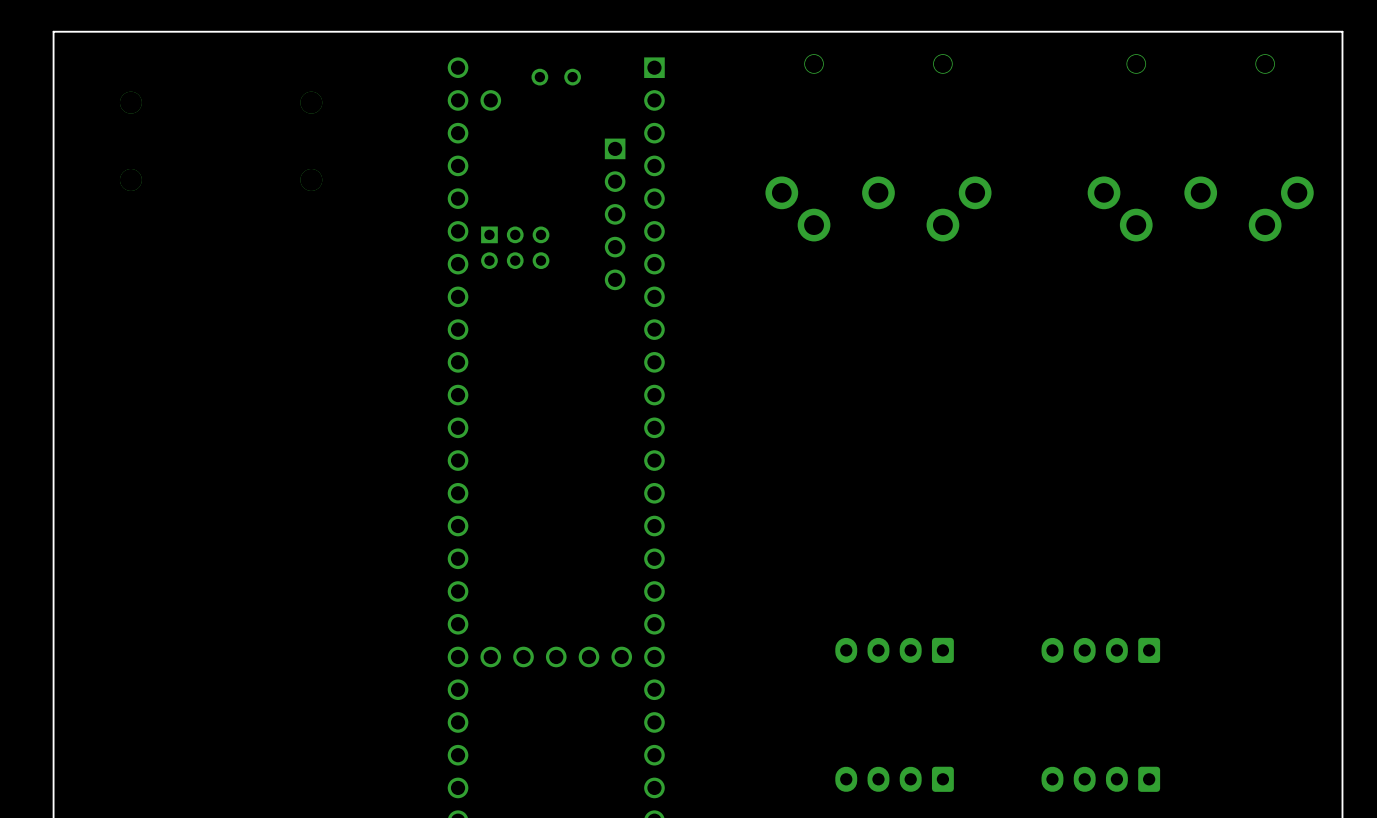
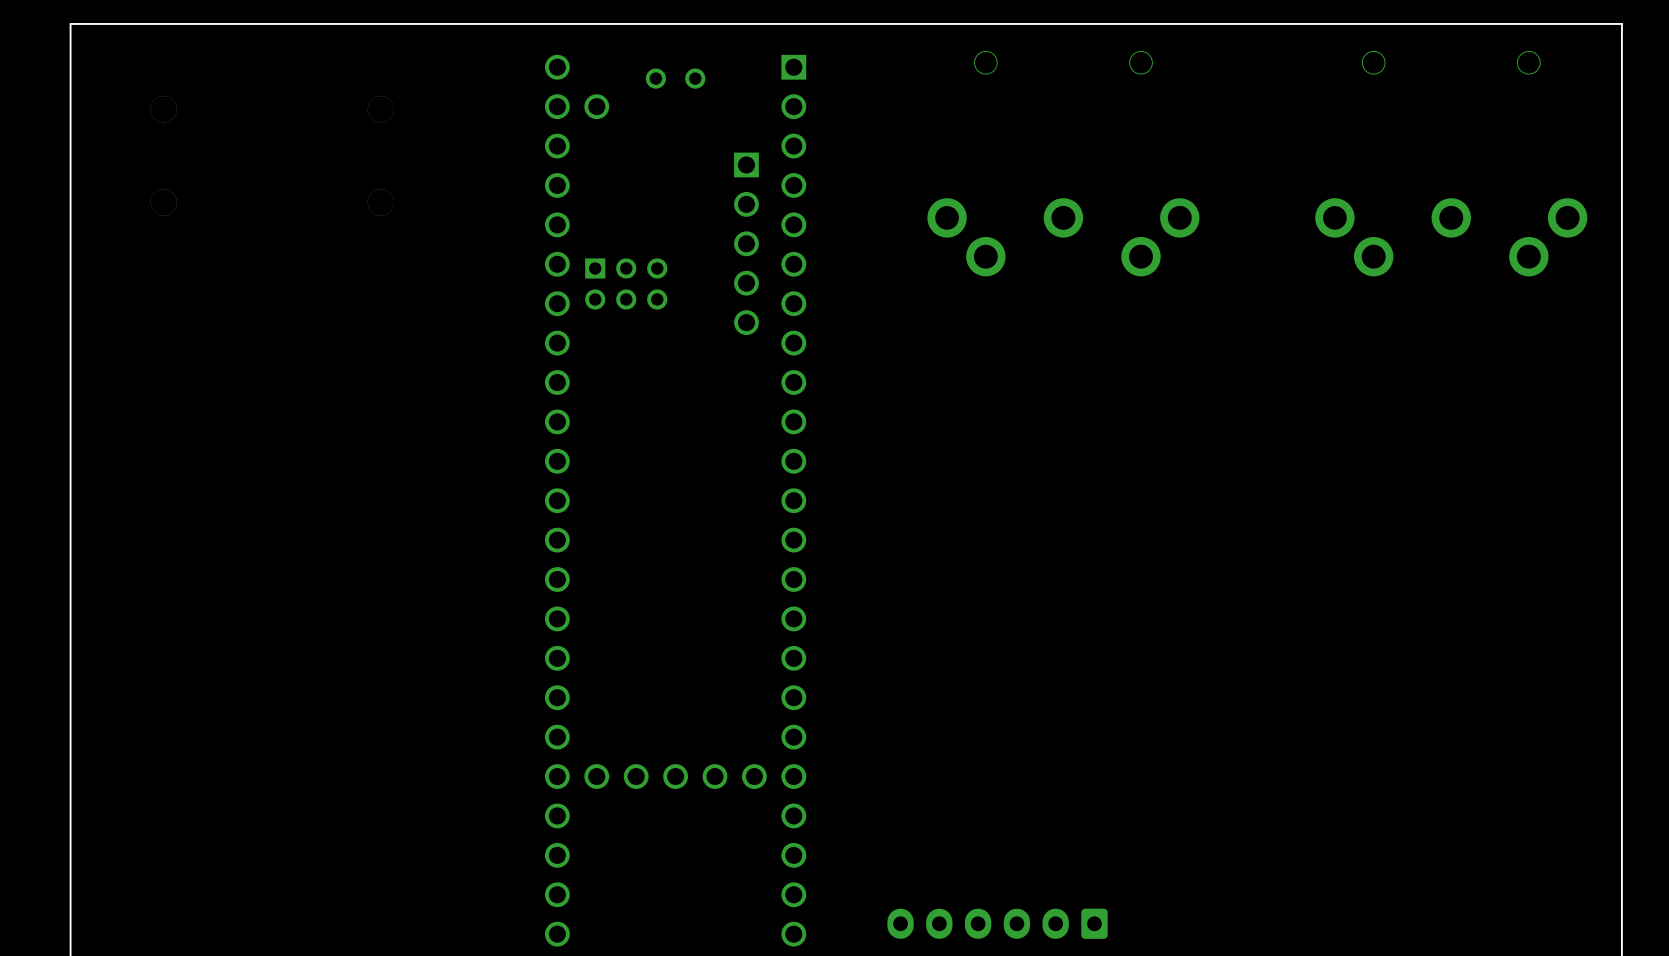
part: (894, 650) -> none
part: (1100, 650) -> none
part: none -> (997, 923)
part: (894, 779) -> none
part: (1100, 779) -> none

